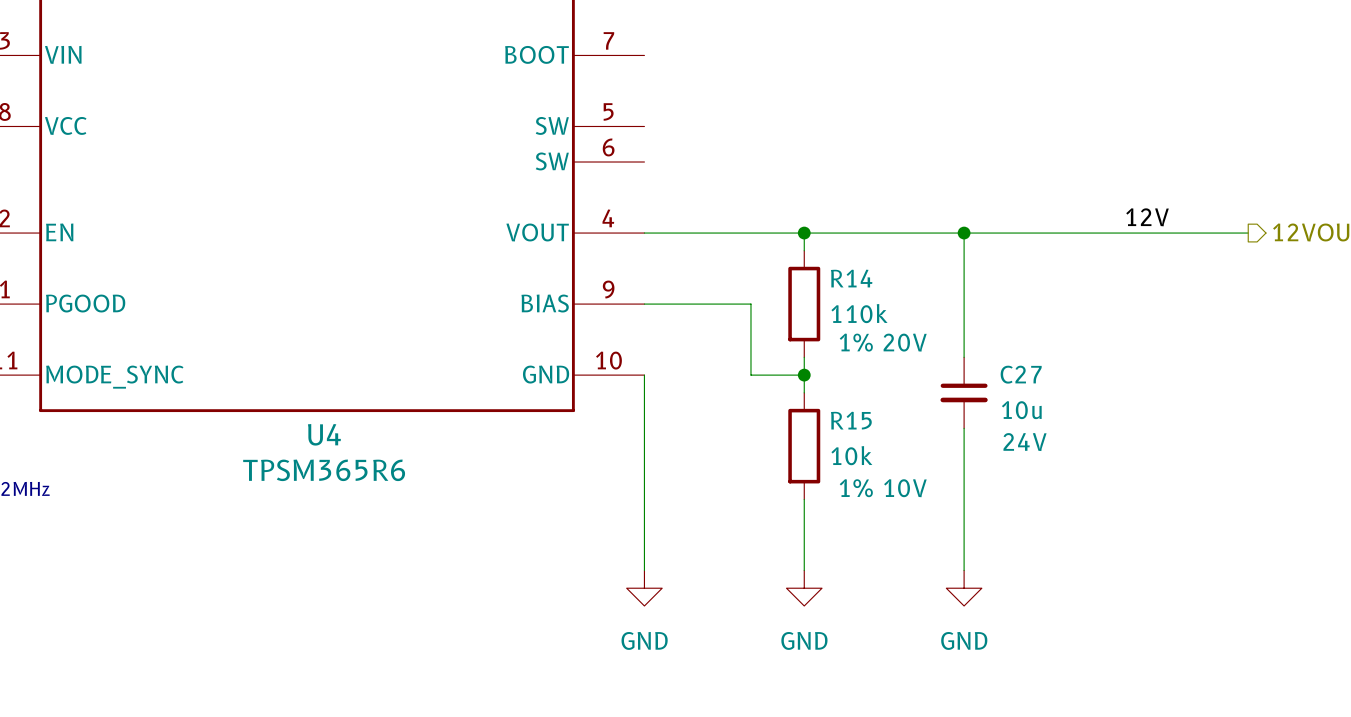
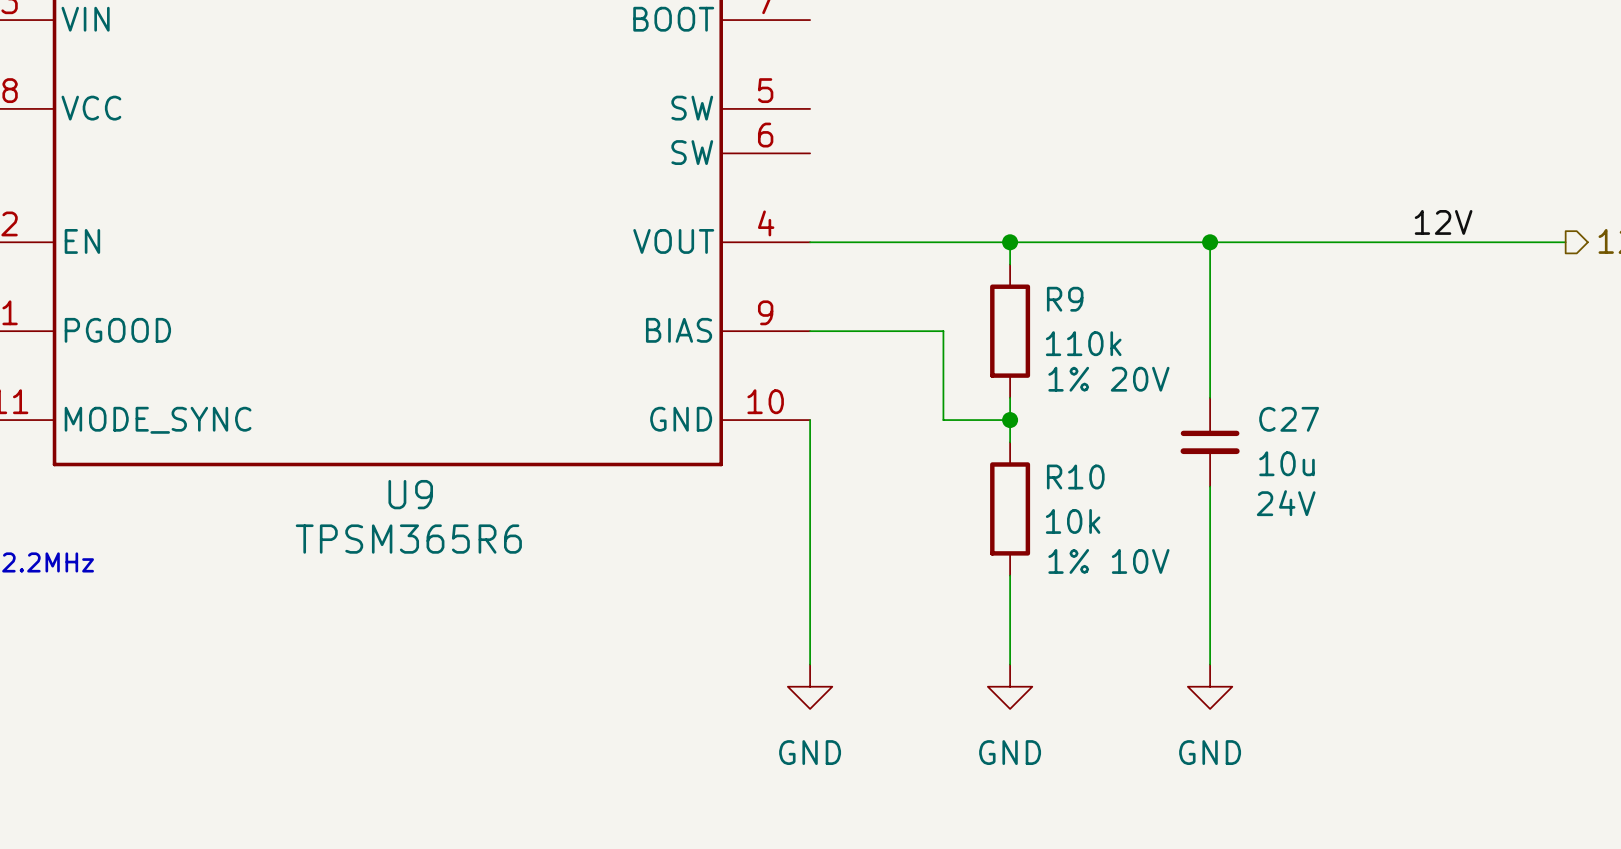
R14 name: R14 (851, 278) -> R9 (1065, 299)
R15 name: R15 (851, 420) -> R10 (1075, 477)
U4 name: U4 (324, 434) -> U9 (410, 494)

